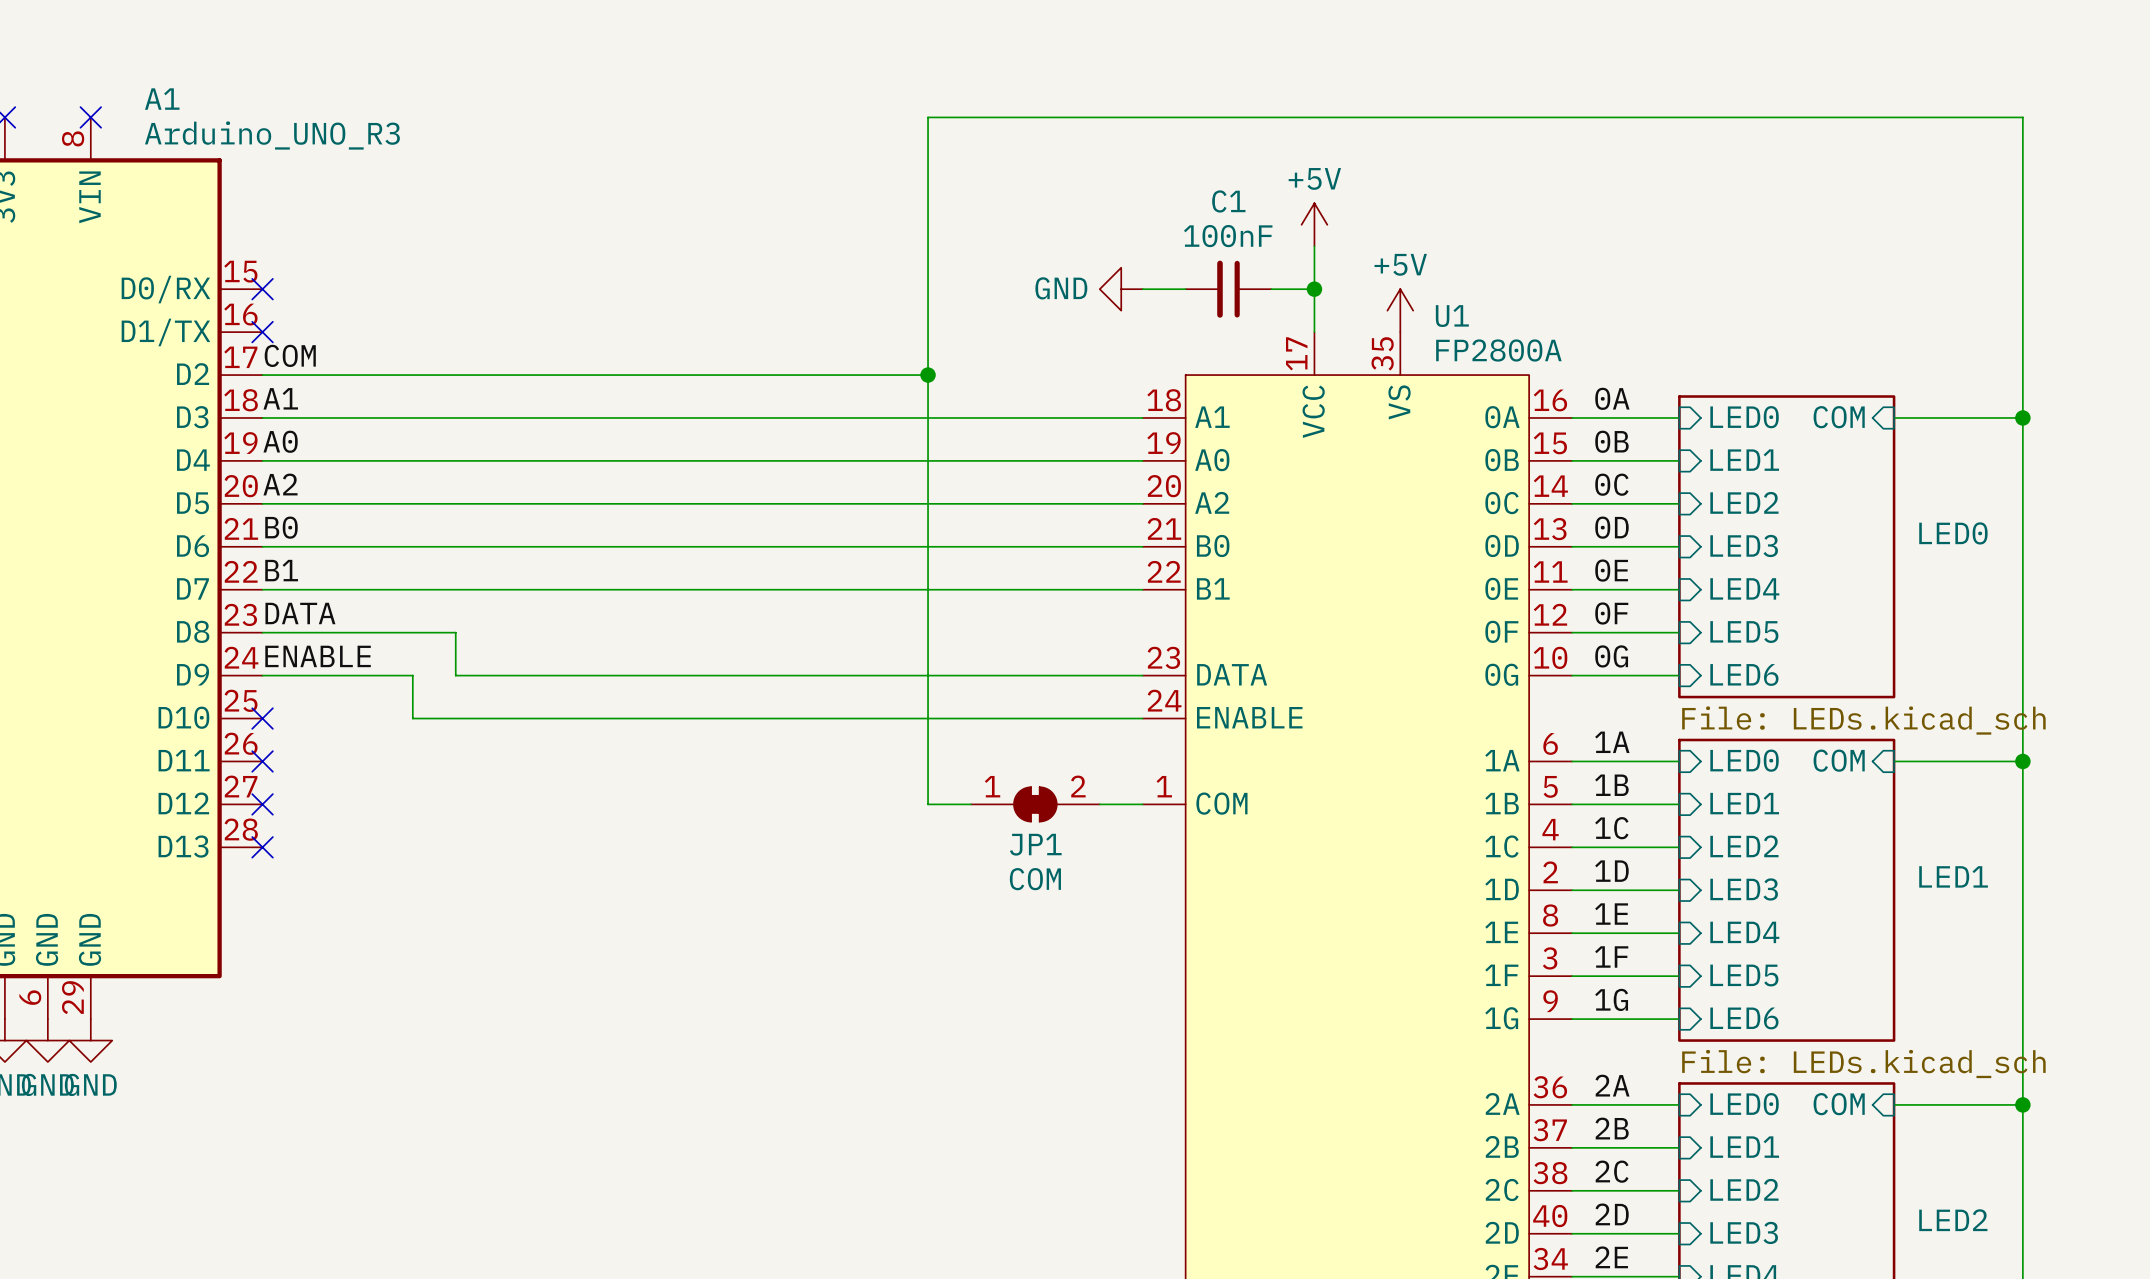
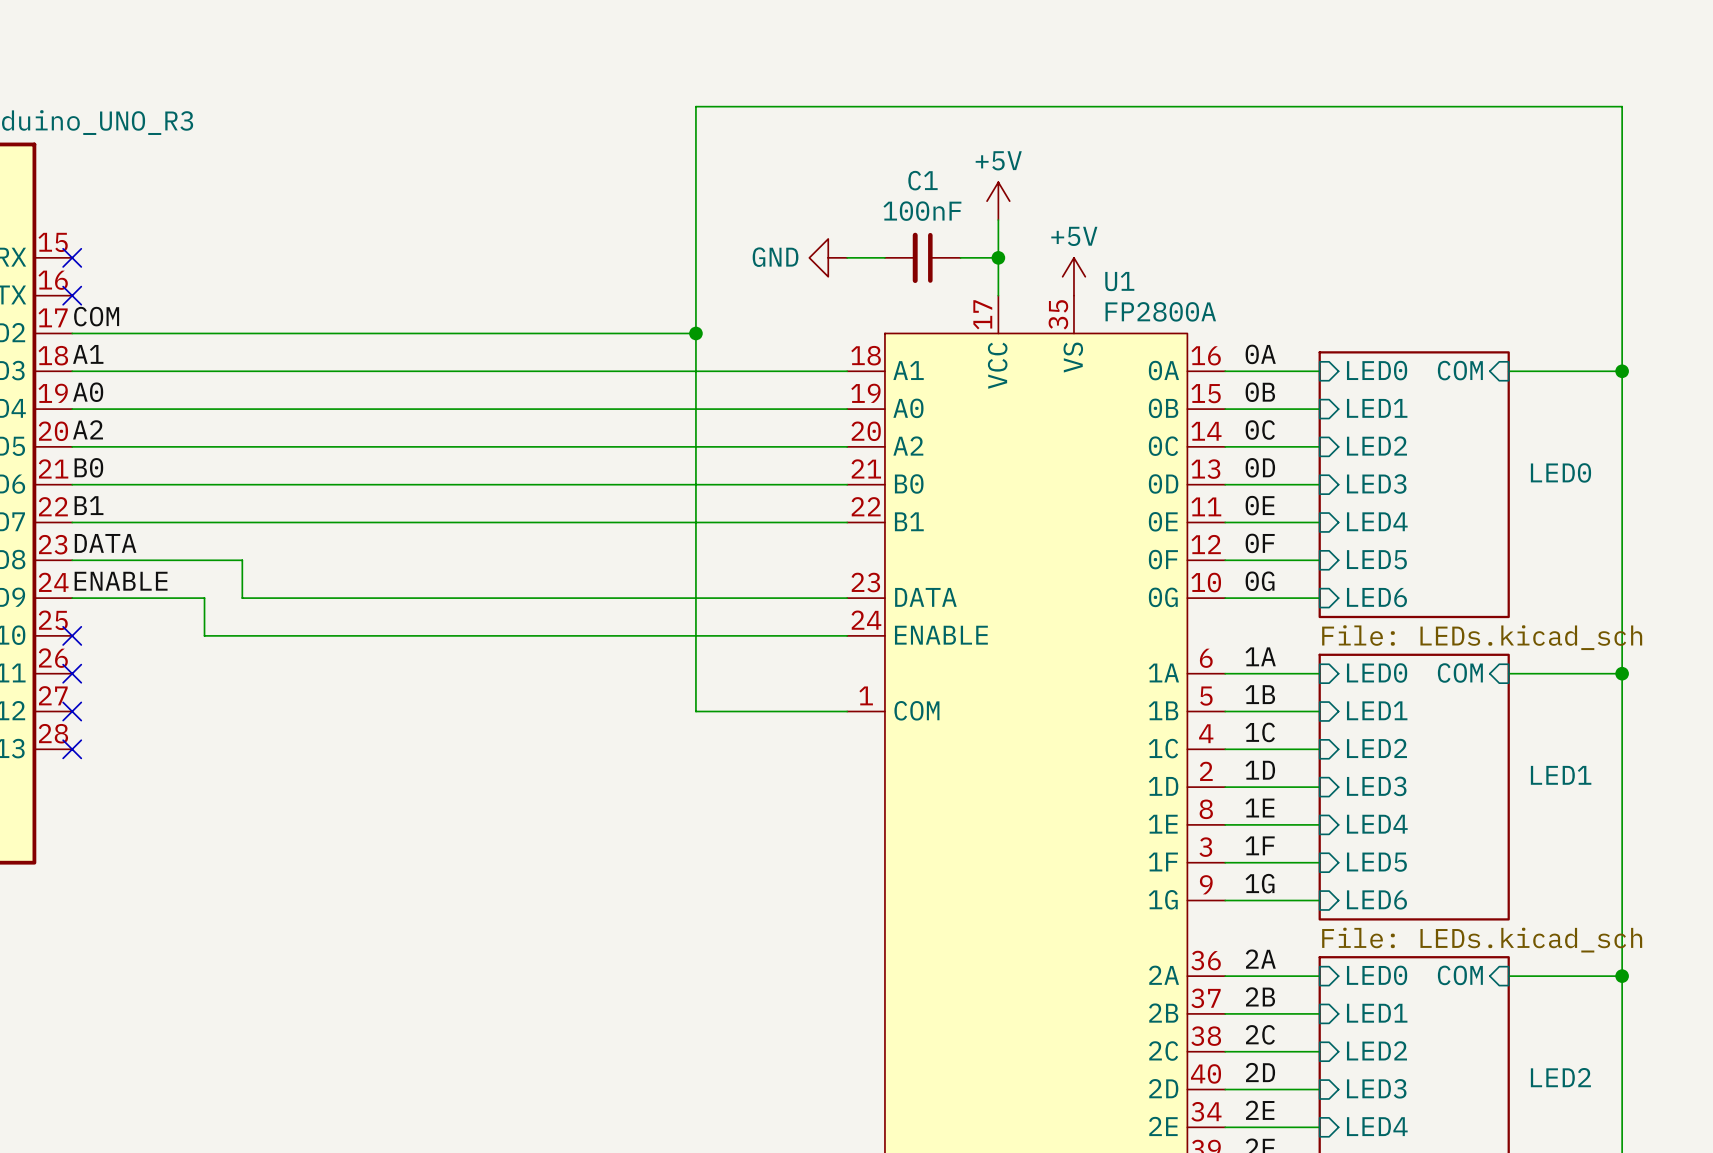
wire: (970, 117) (928, 117) (928, 804) (970, 804) -> (695, 106) (695, 711) (809, 711)
wire: none -> (658, 333) (695, 333)
junction position: (928, 375) -> (695, 333)
JP1: COM (1035, 804) -> none

